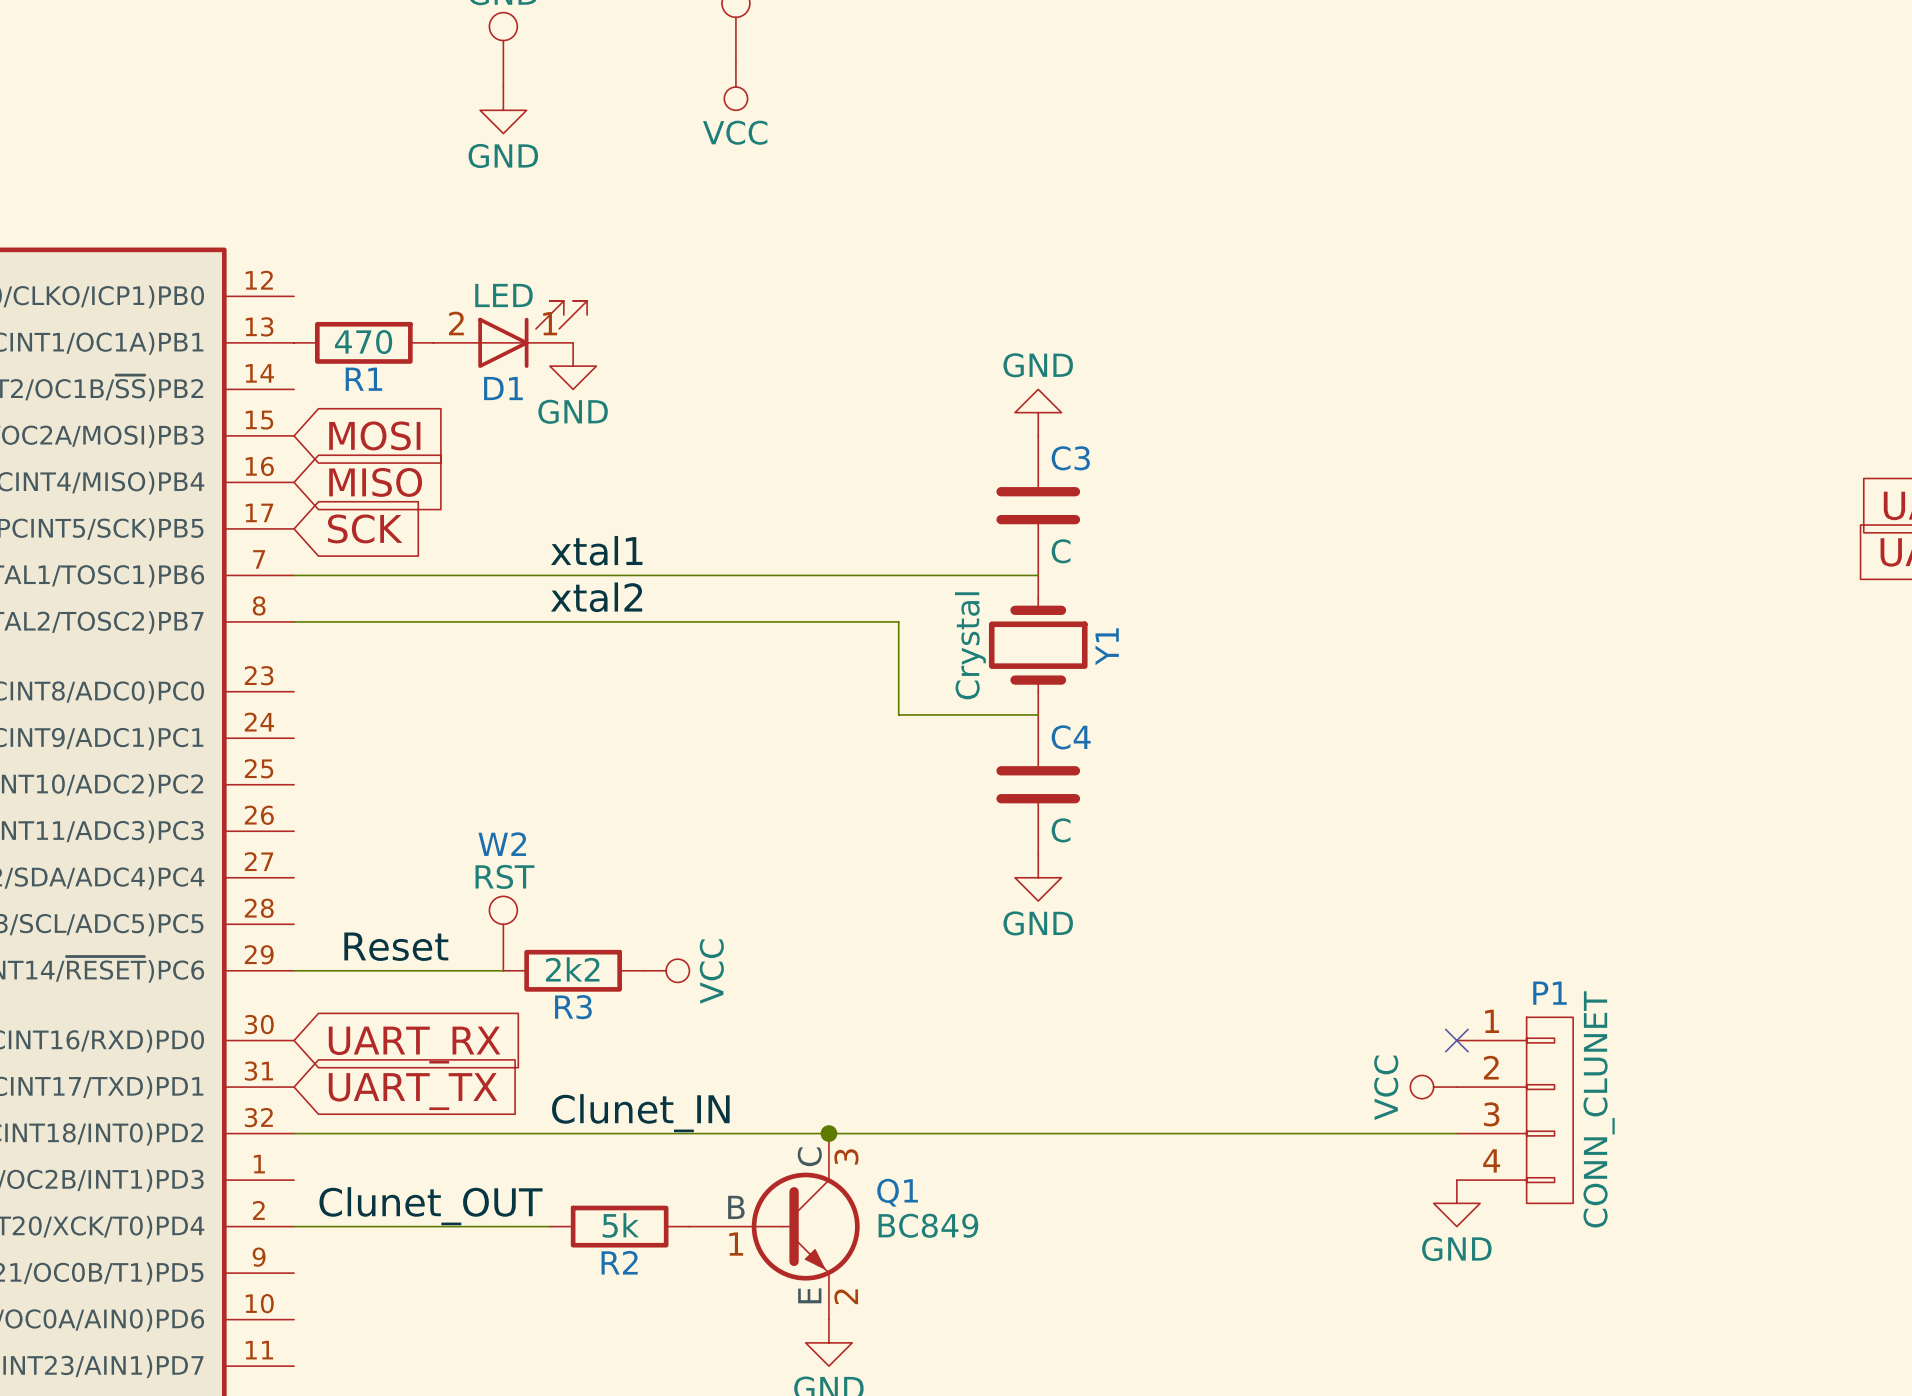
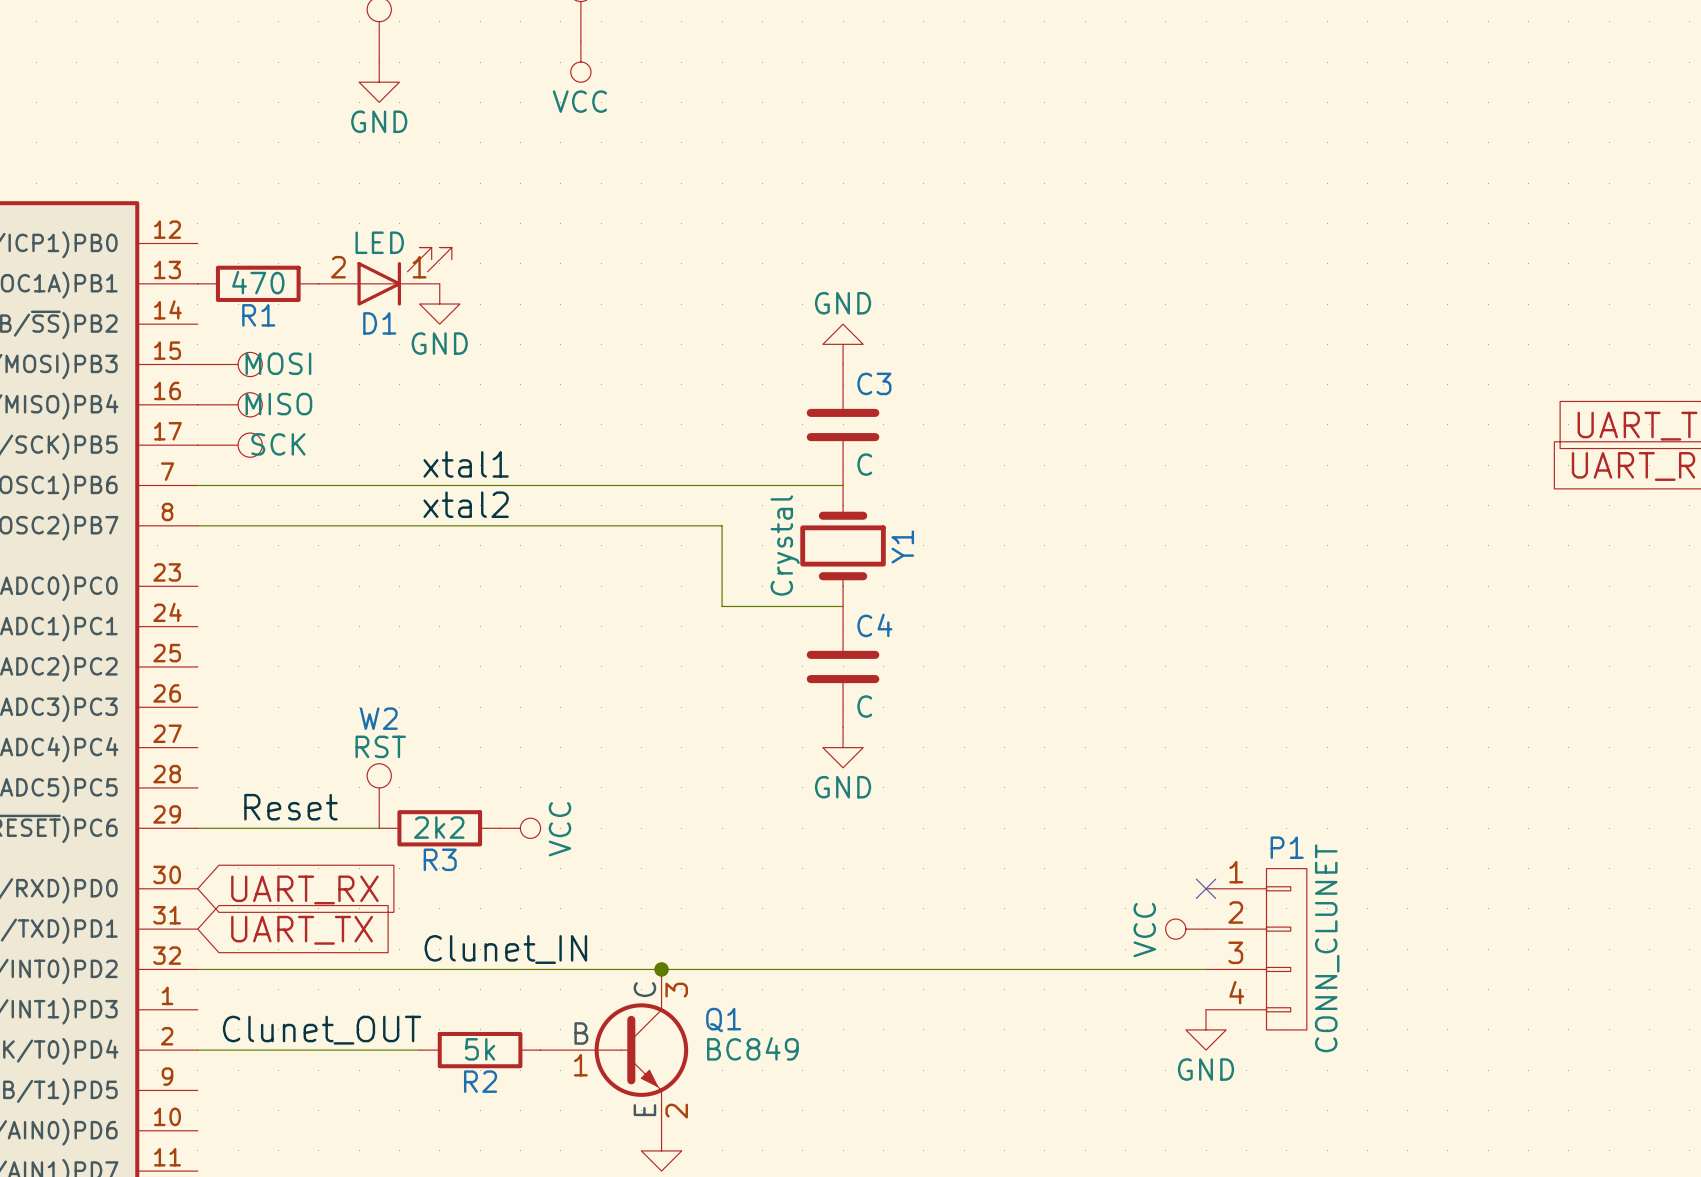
part: none -> MOSI (230, 364)
global label: MOSI (374, 435) -> none
part: none -> MISO (230, 404)
global label: MISO (375, 482) -> none
part: none -> SCK (230, 445)
global label: SCK (365, 528) -> none

